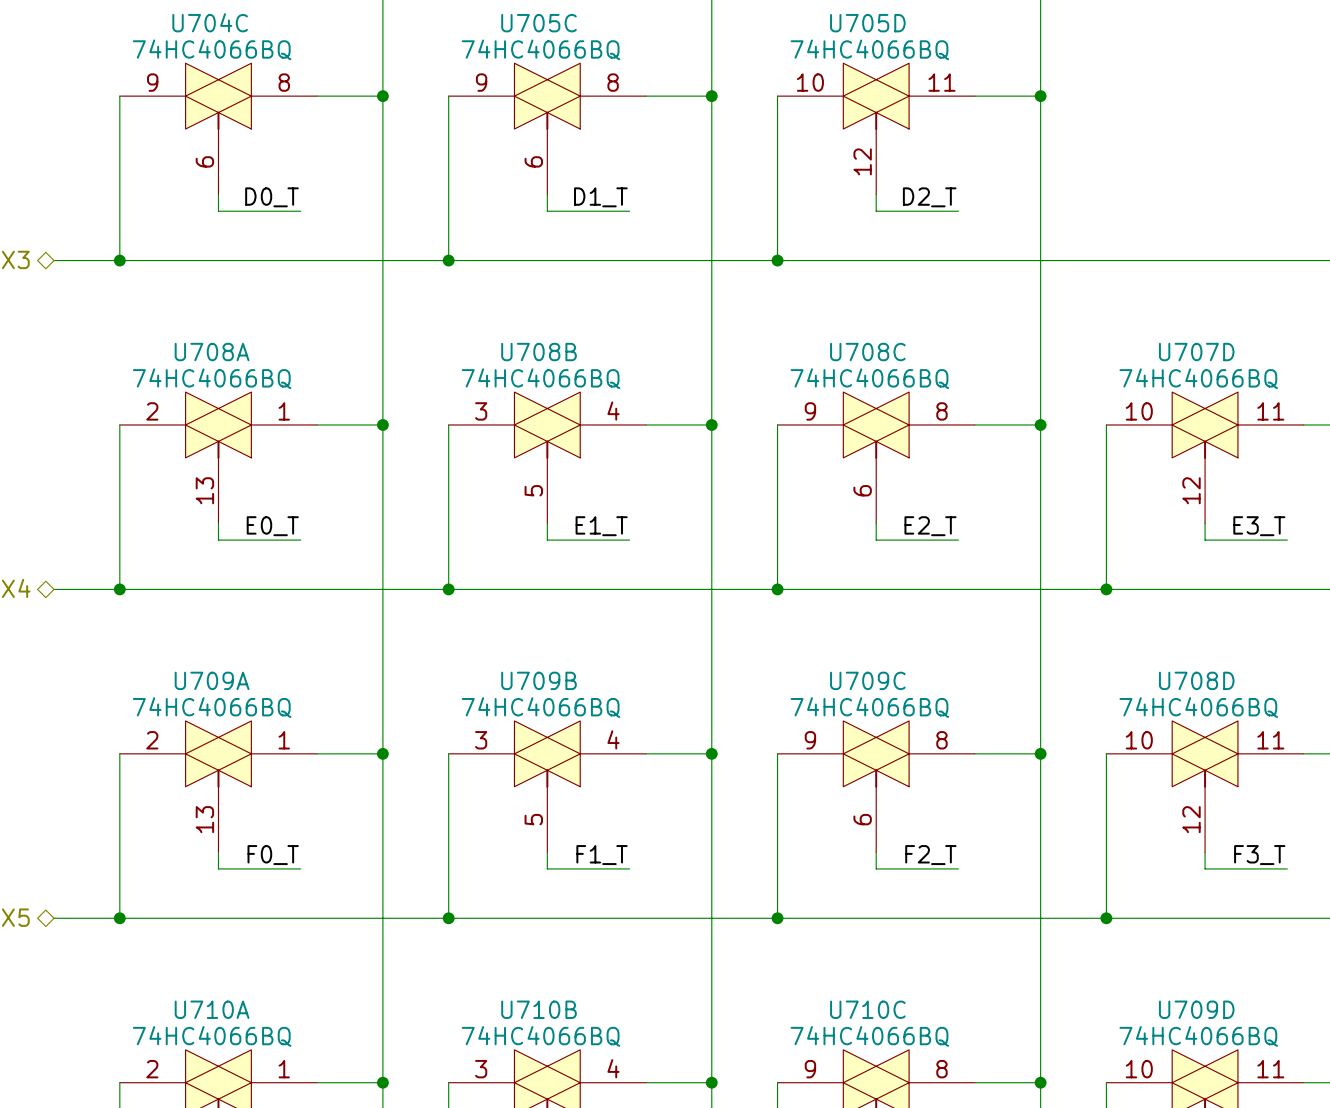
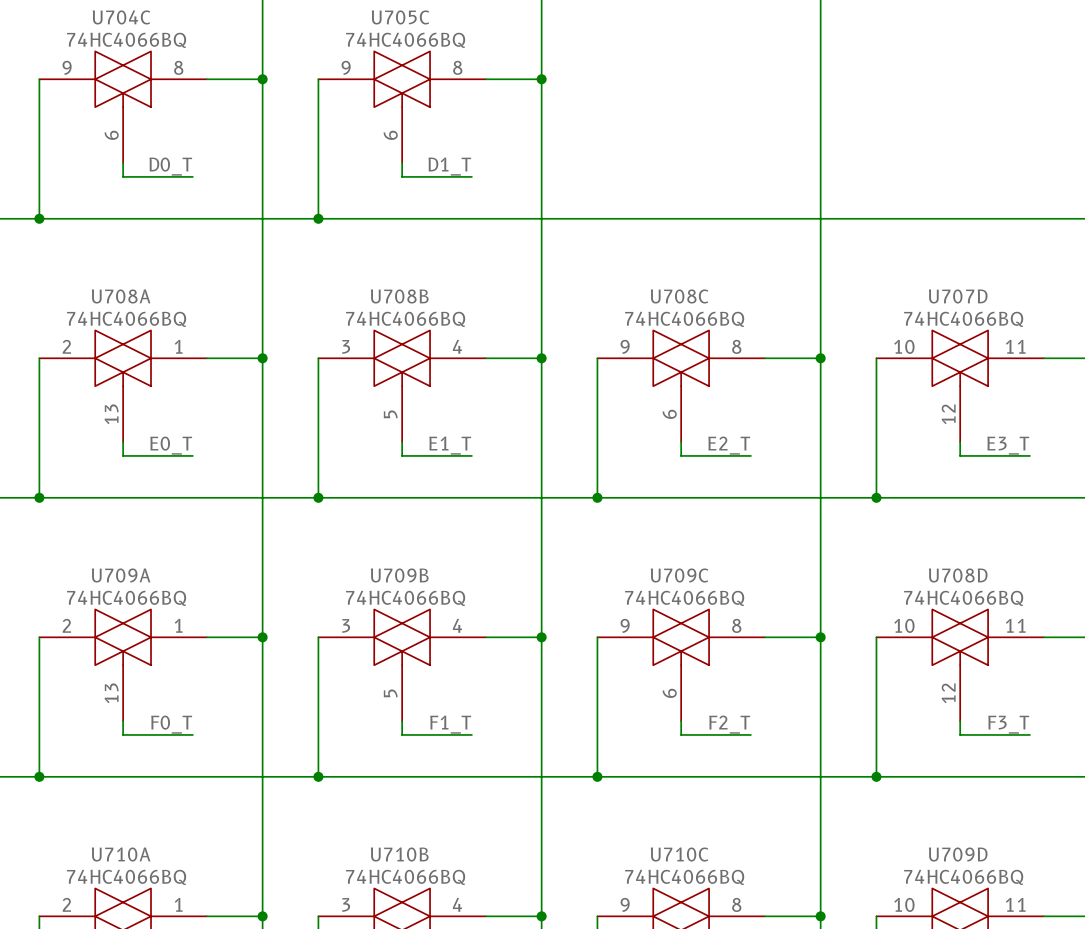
wire: (777, 96) (777, 260) -> none
wire: (974, 96) (1040, 96) -> none
junction: (1040, 96) -> none
U705D: 74HC4066BQ (876, 129) -> none
wire: (876, 194) (876, 211) (958, 211) -> none
label: D2_T (929, 197) -> none
junction: (777, 260) -> none

